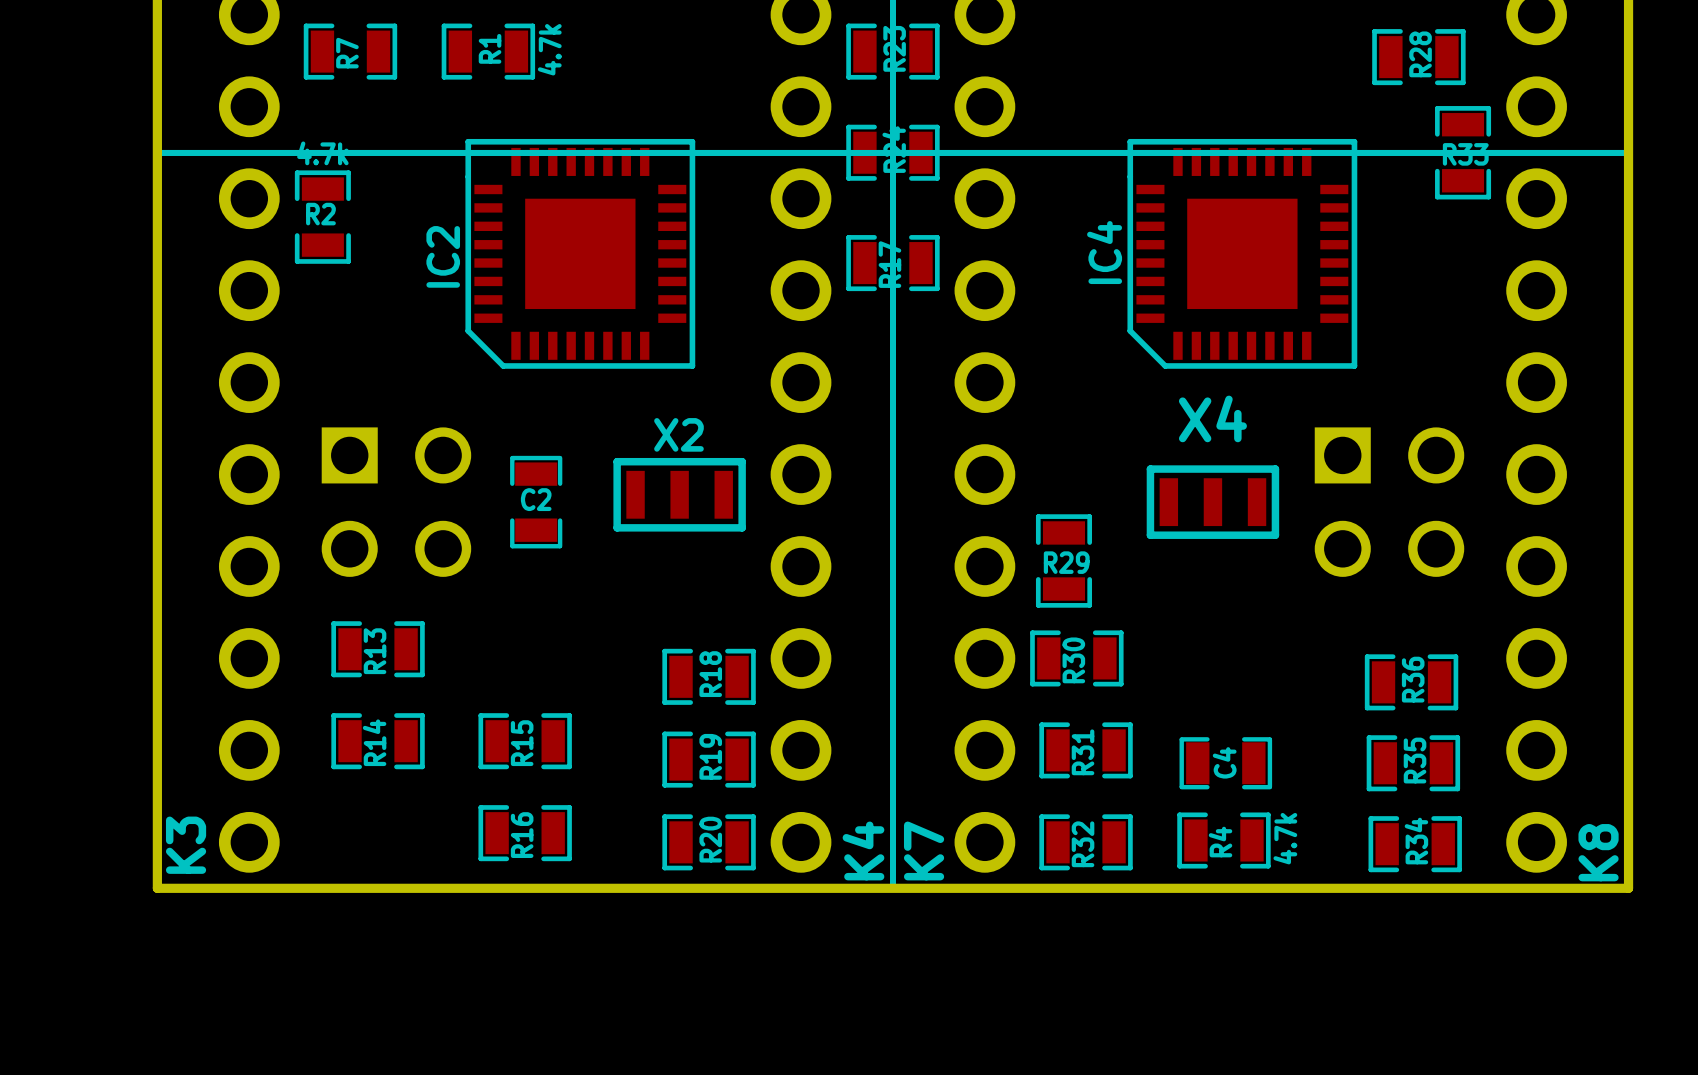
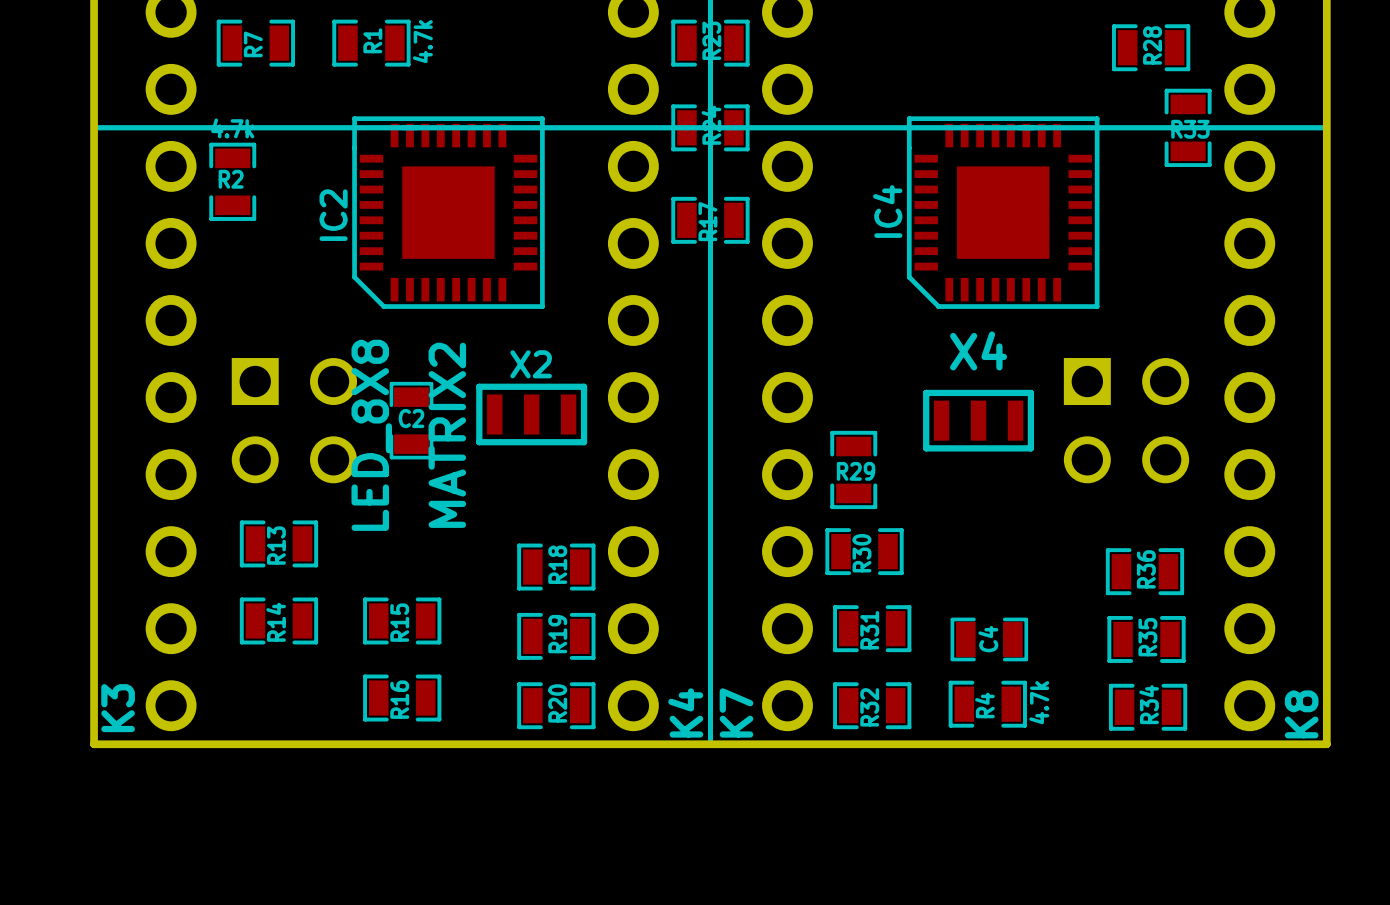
MATRIX2 value: none -> LED_8X8 (371, 435)
MATRIX2 name: none -> MATRIX2 (447, 435)

